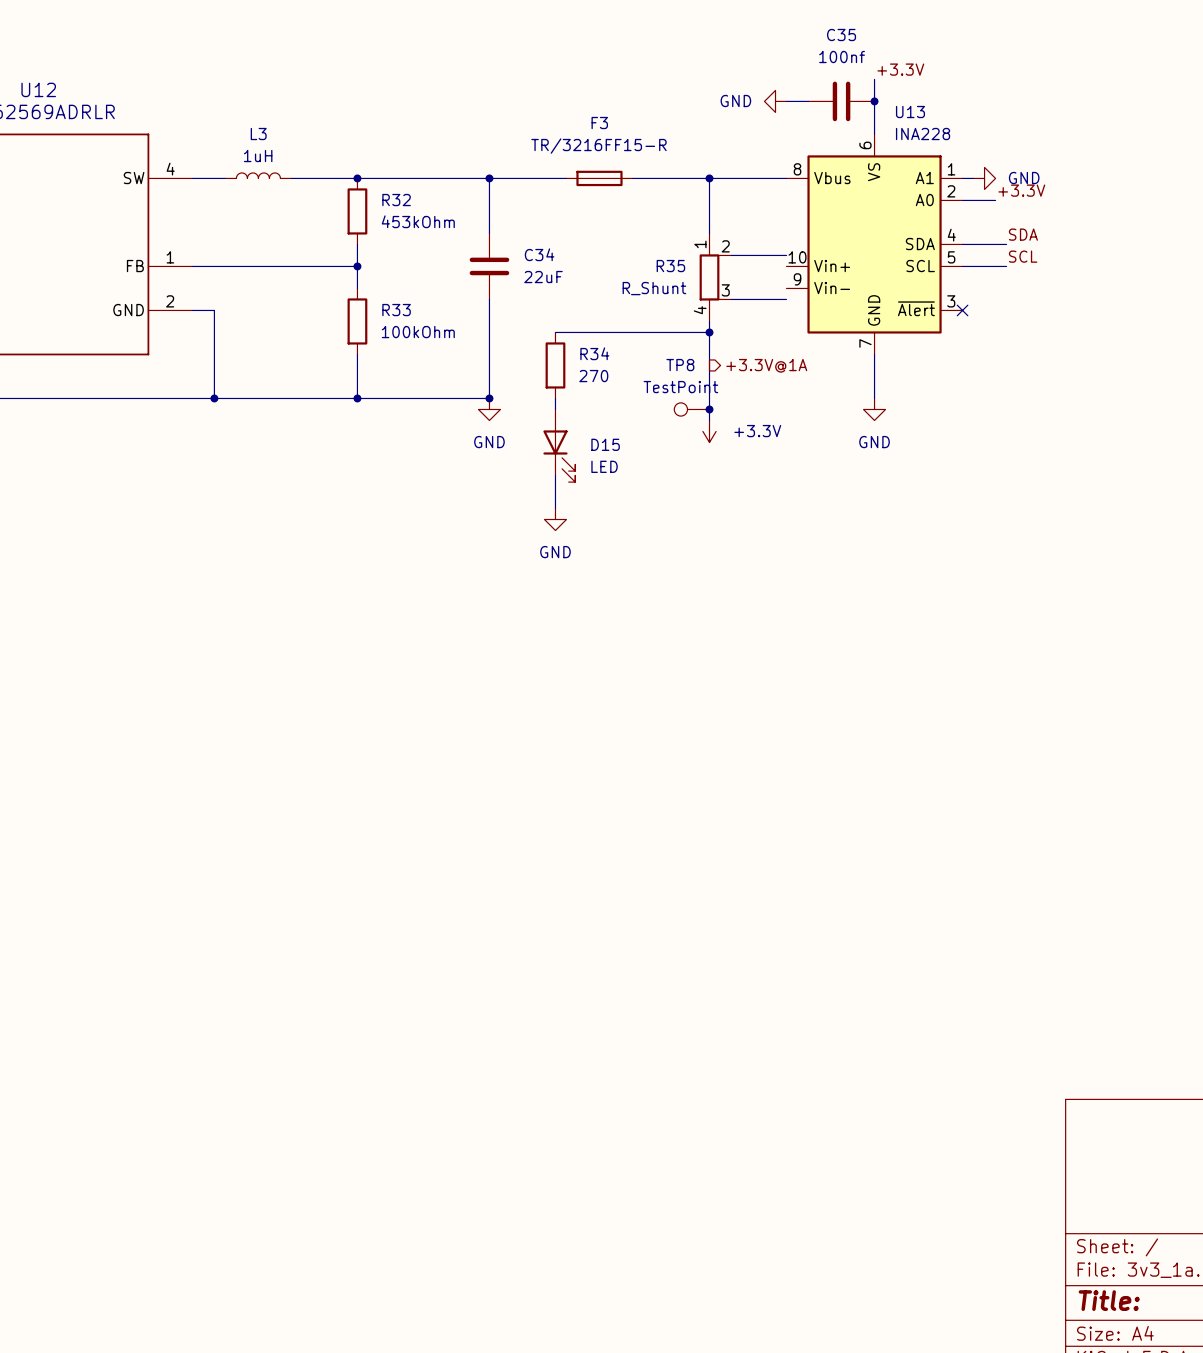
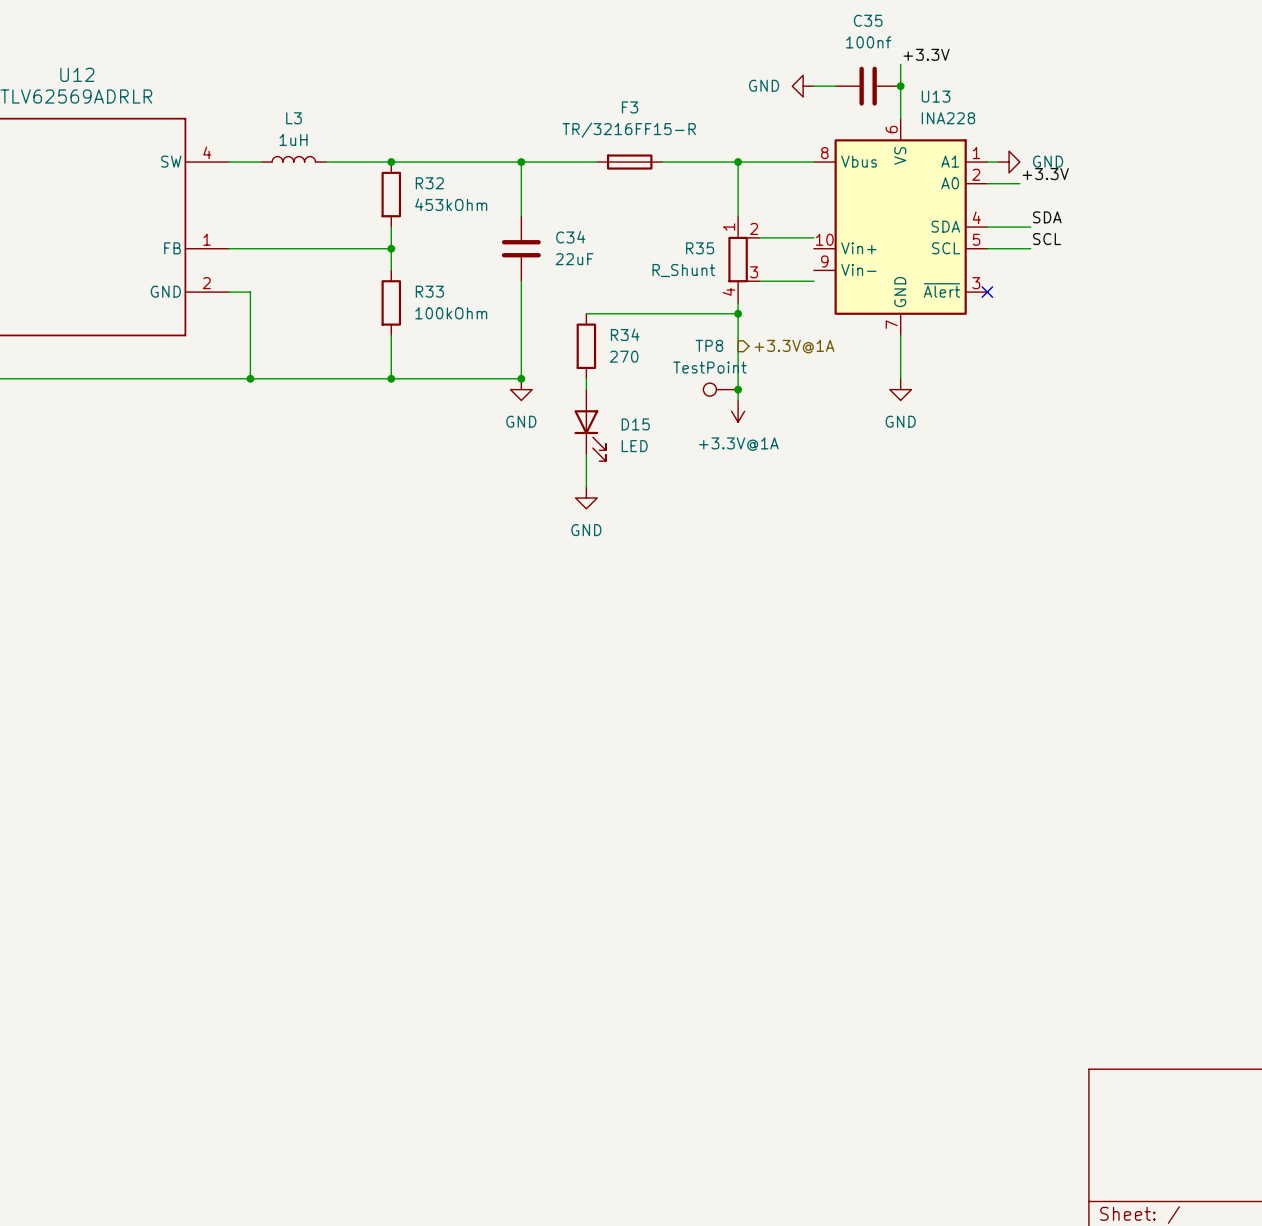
power symbol: +3.3V (709, 431) -> +3.3V@1A (738, 411)

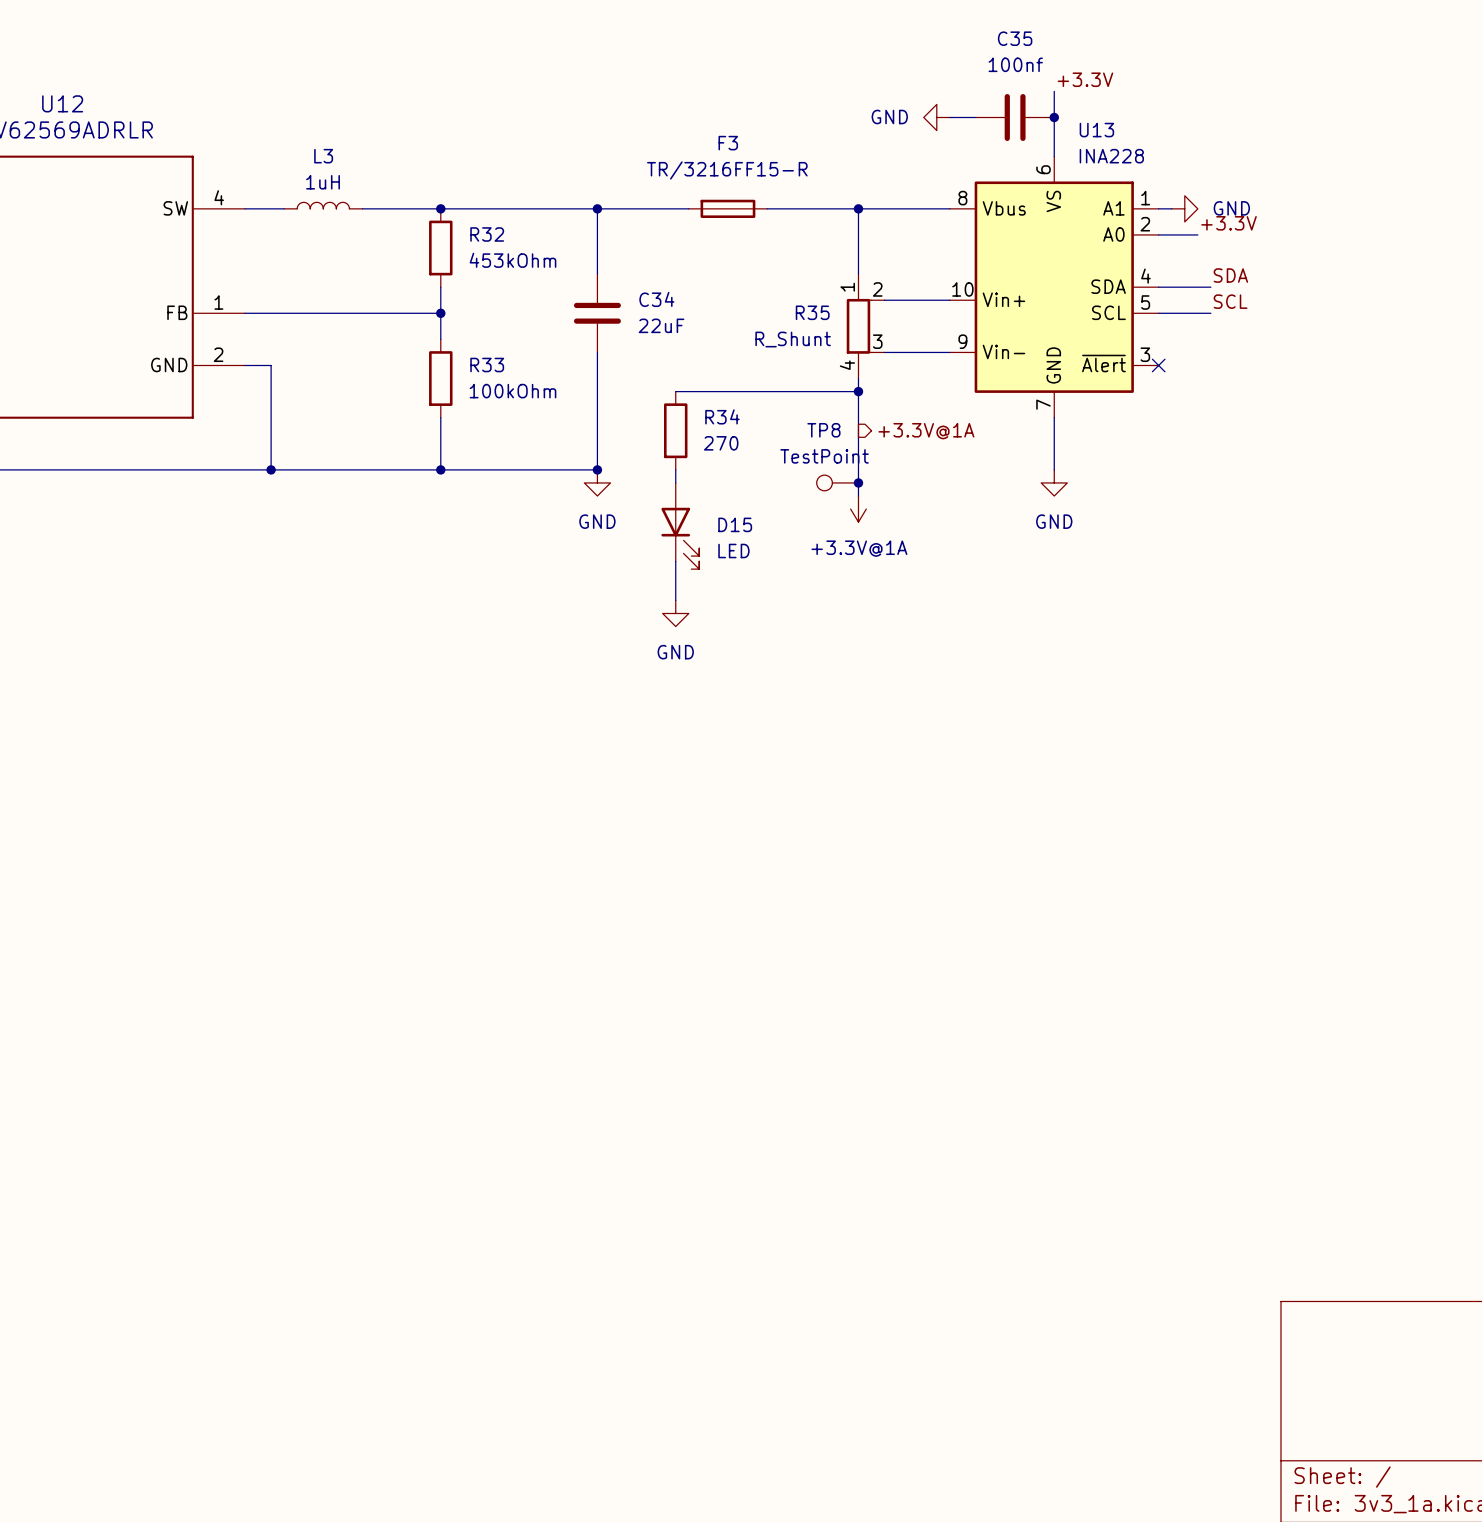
U13 symbol: [813, 118, 988, 336] -> [949, 156, 1159, 418]

